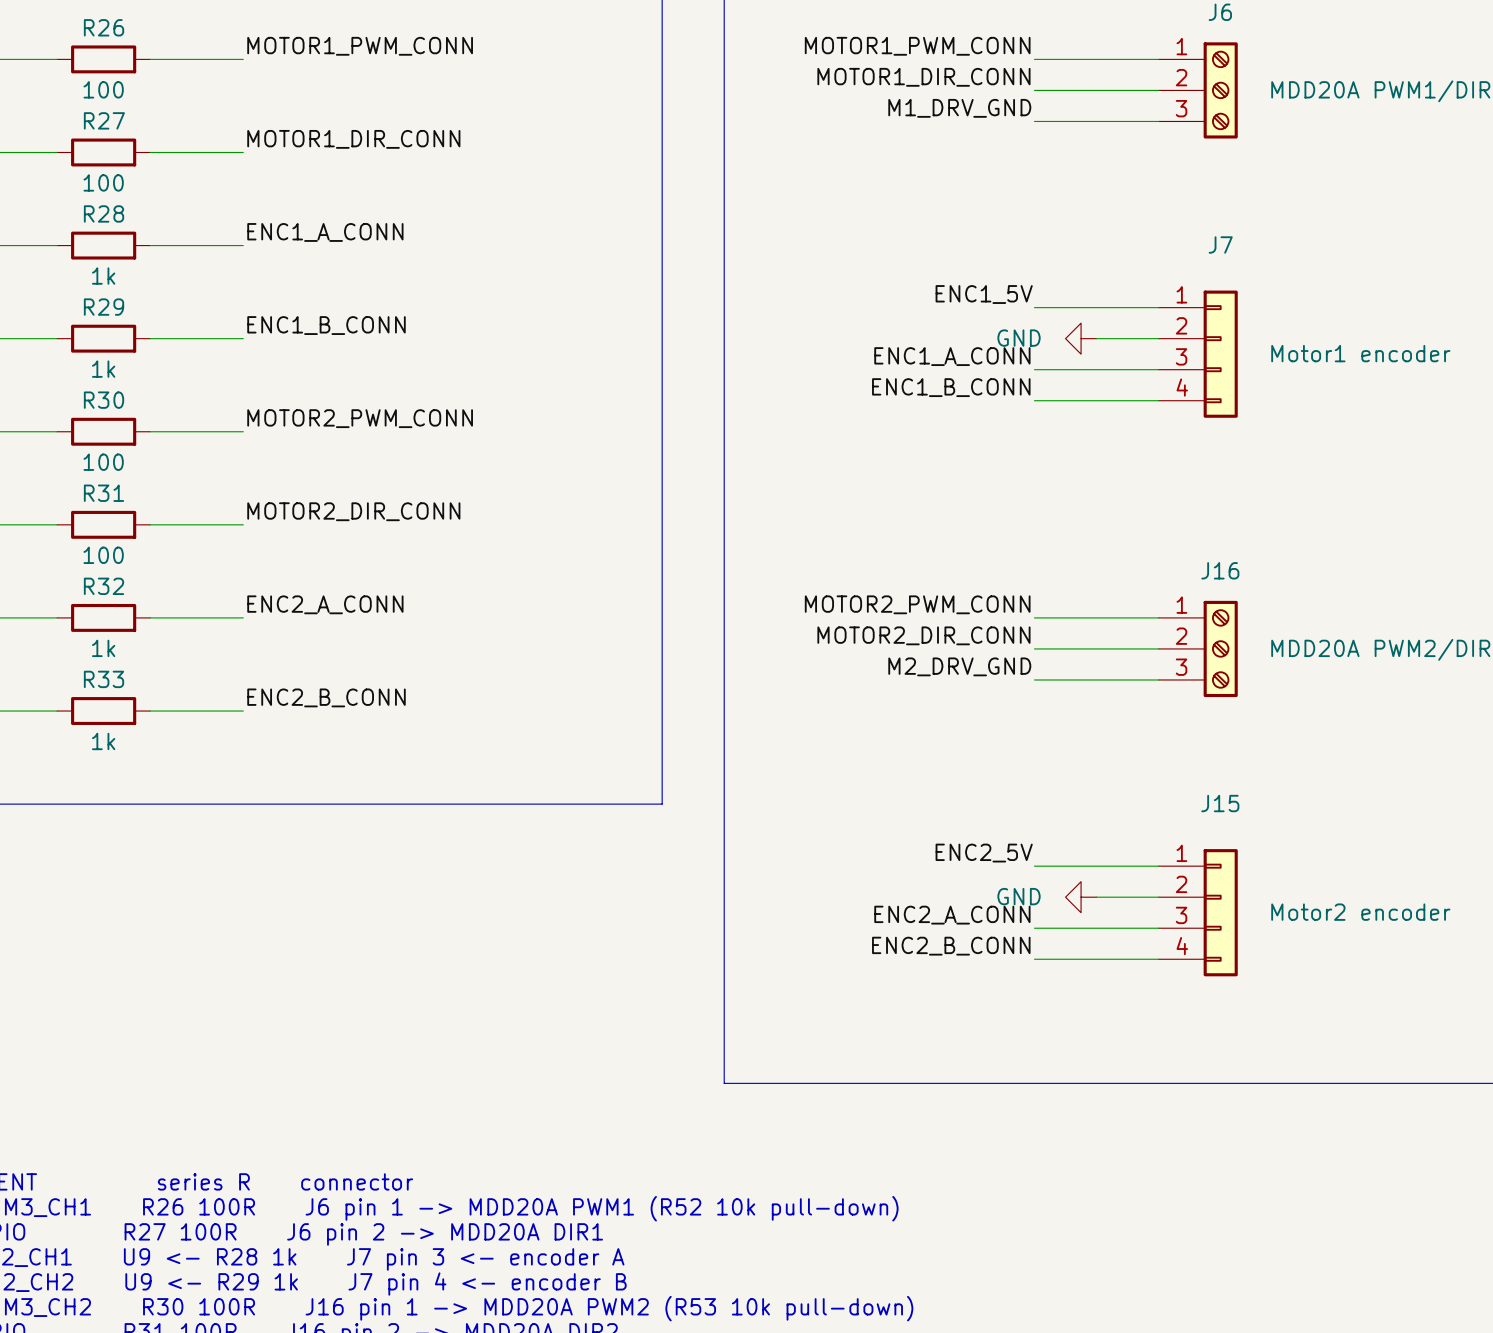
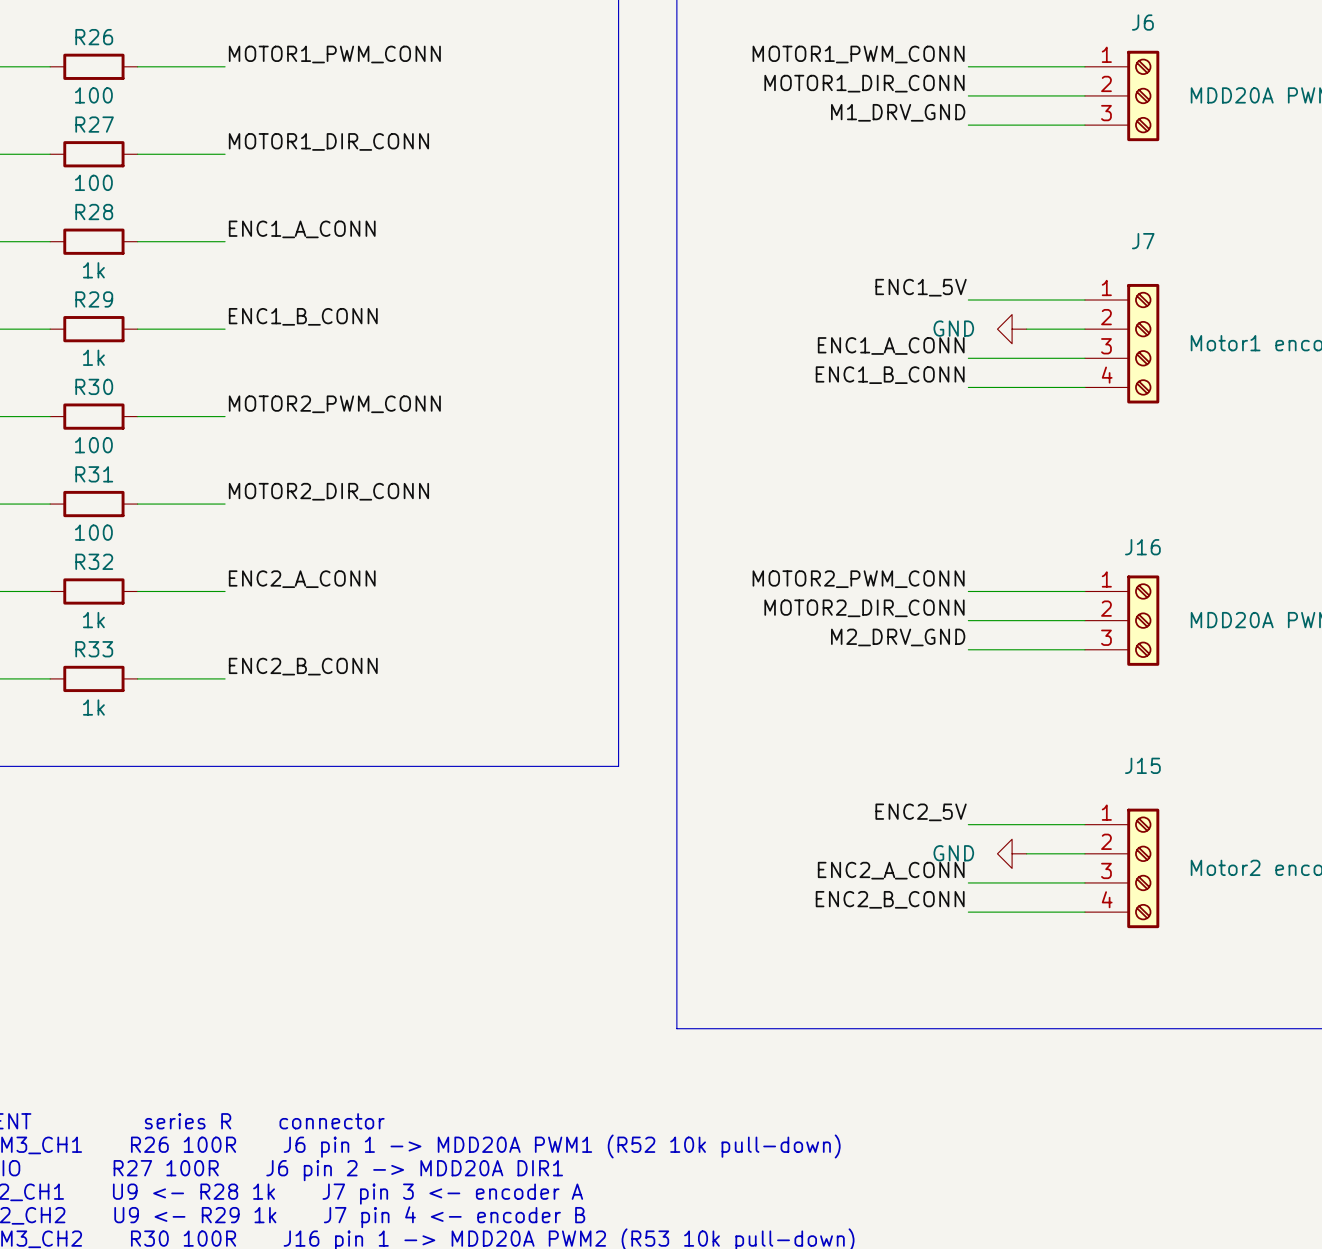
J7 symbol: [1158, 290, 1238, 418] -> [1084, 283, 1160, 404]
J15 symbol: [1158, 849, 1238, 977] -> [1084, 808, 1160, 929]

